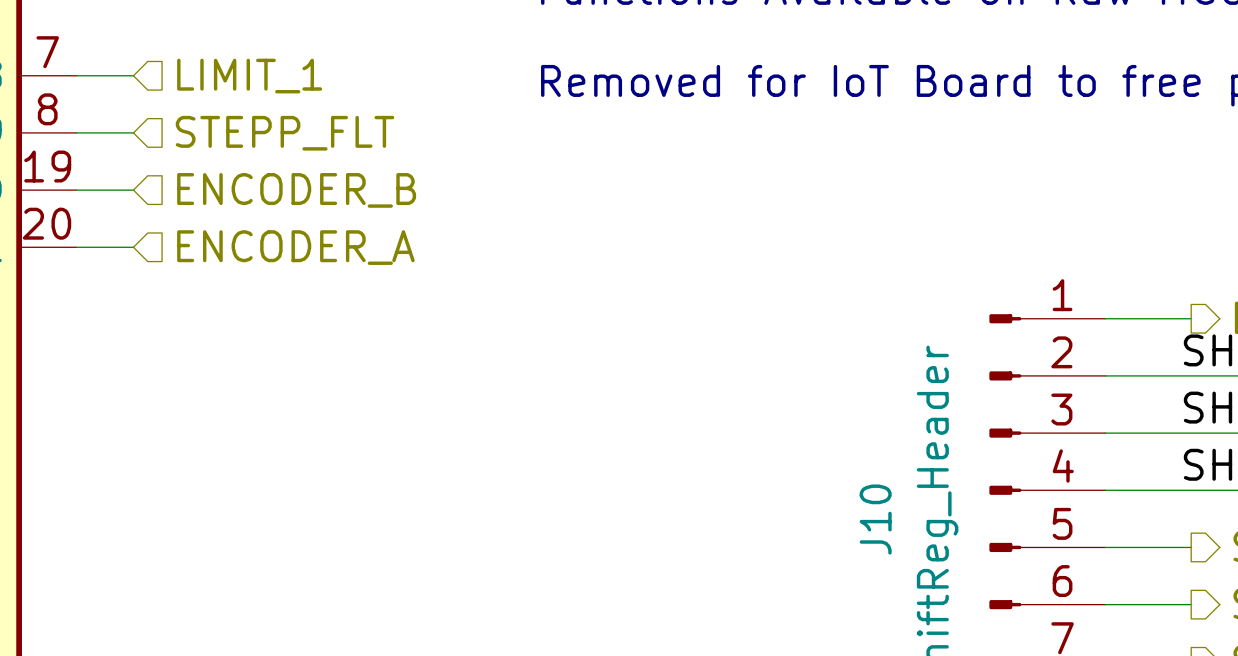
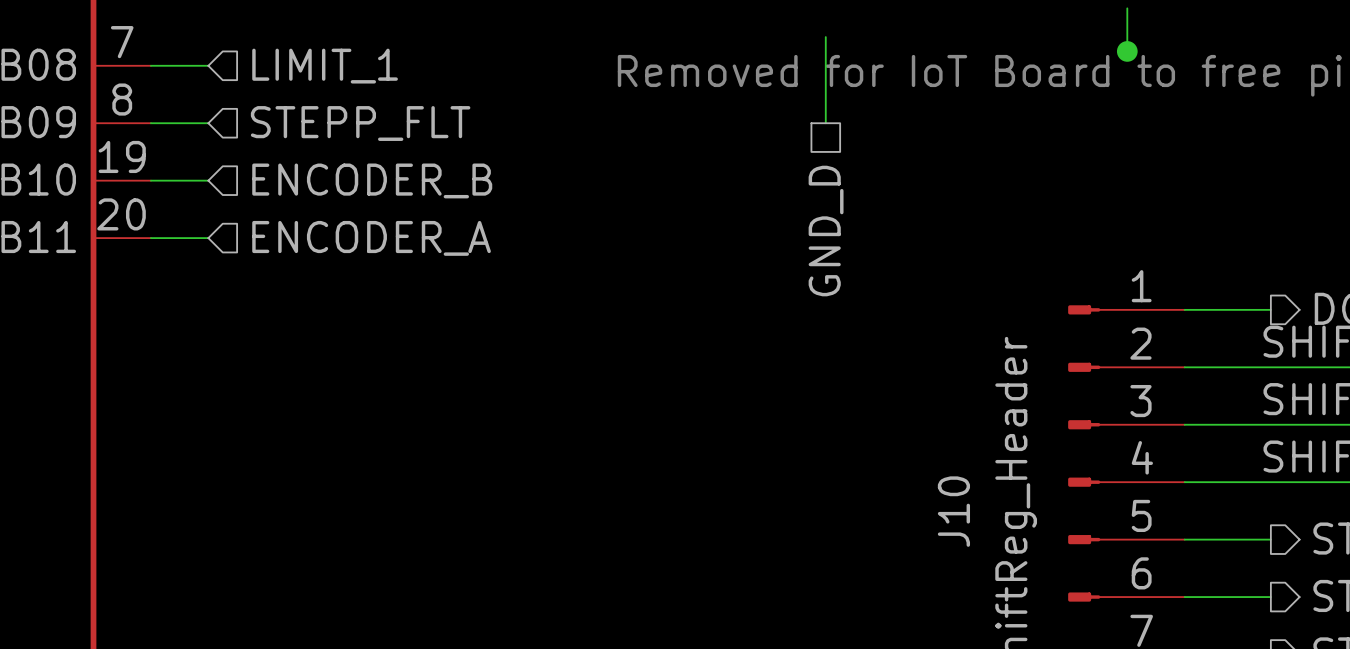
wire: none -> (1127, 8) (1127, 51)
wire: none -> (825, 37) (825, 123)
junction: none -> (1127, 51)
hierarchical label: none -> GND_D (826, 231)

